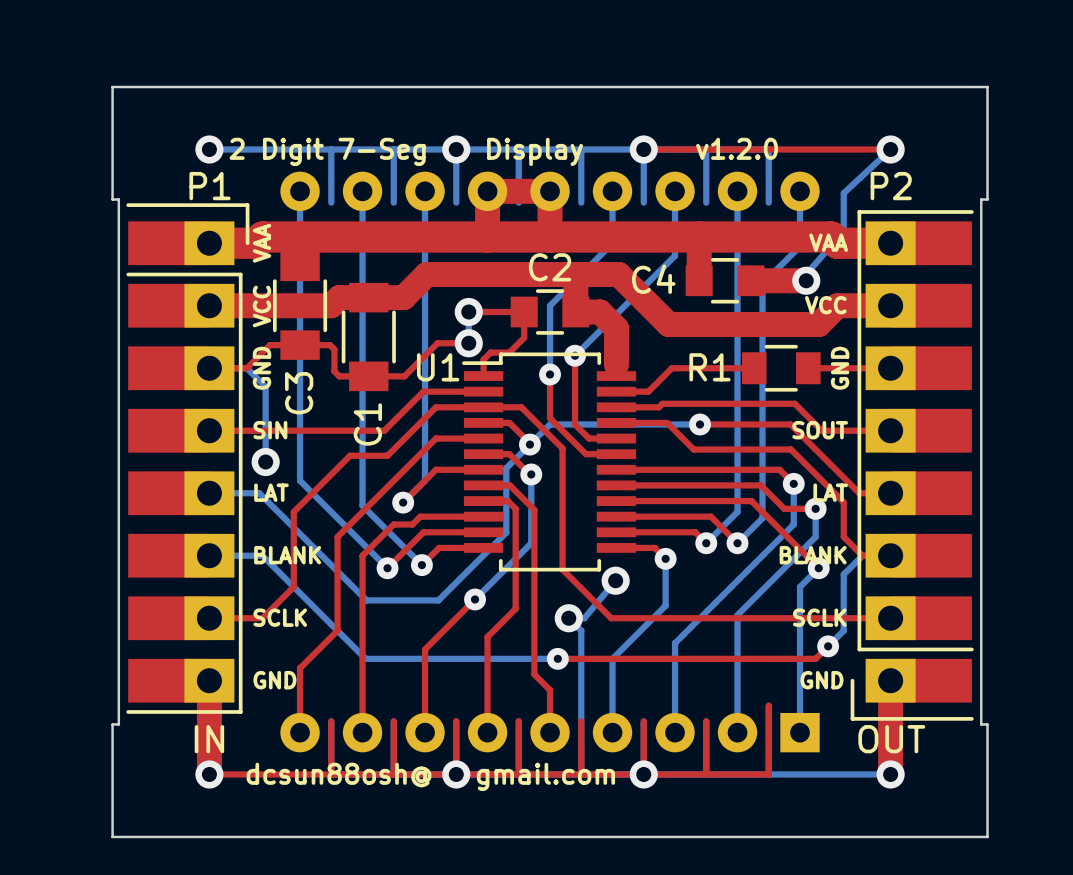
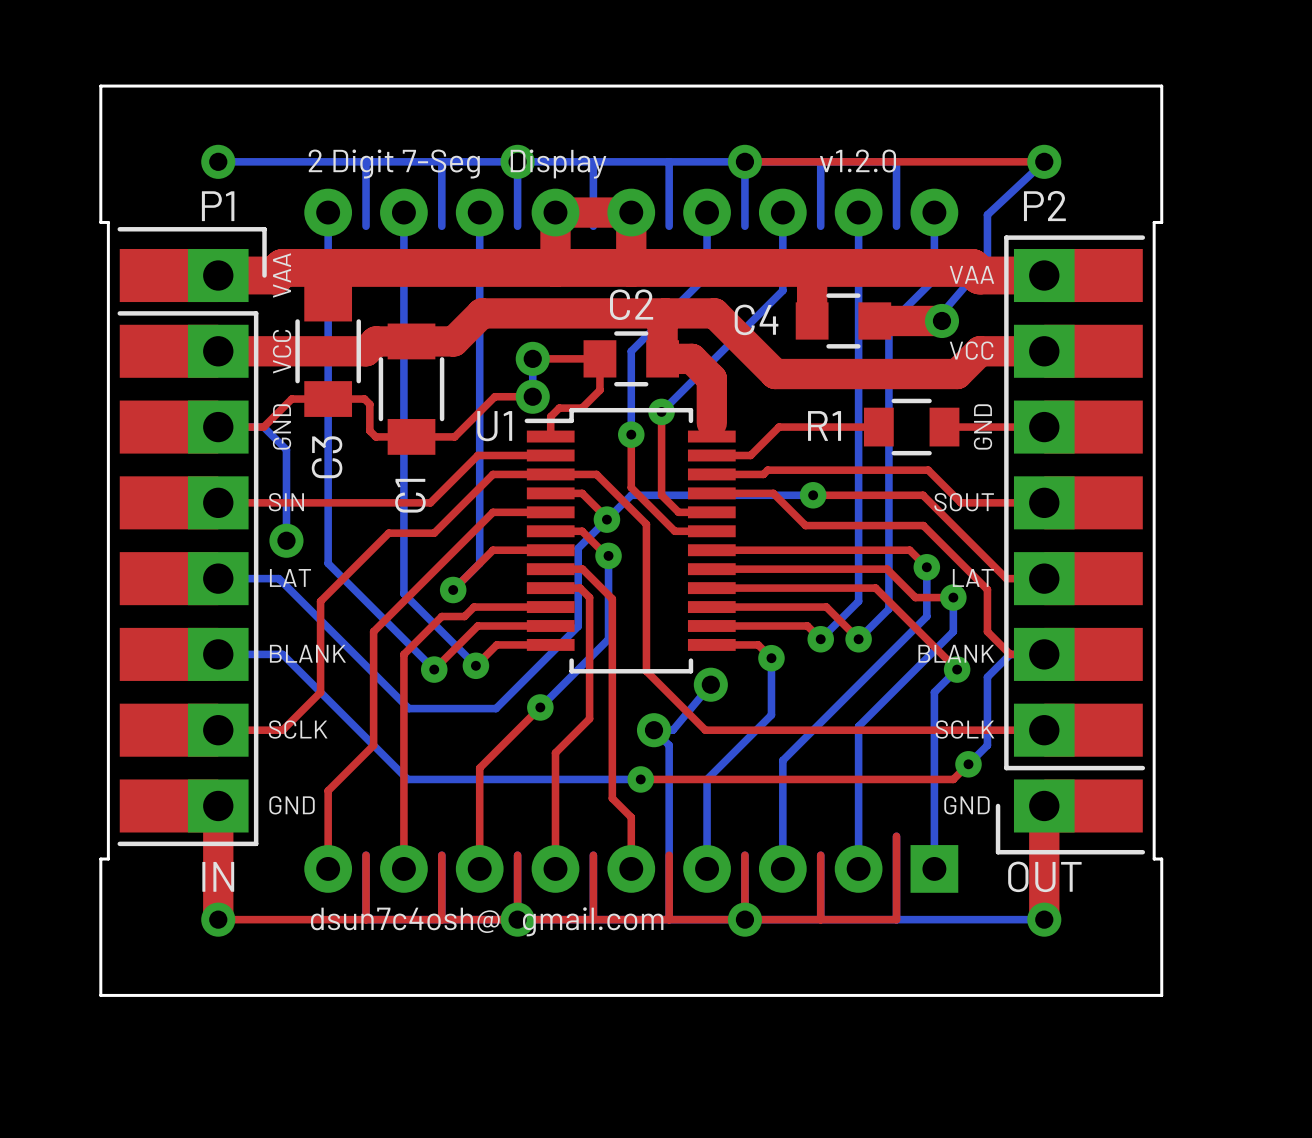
text: dcsun88osh@ gmail.com (430, 776) -> dsun7c4osh@ gmail.com (487, 921)

